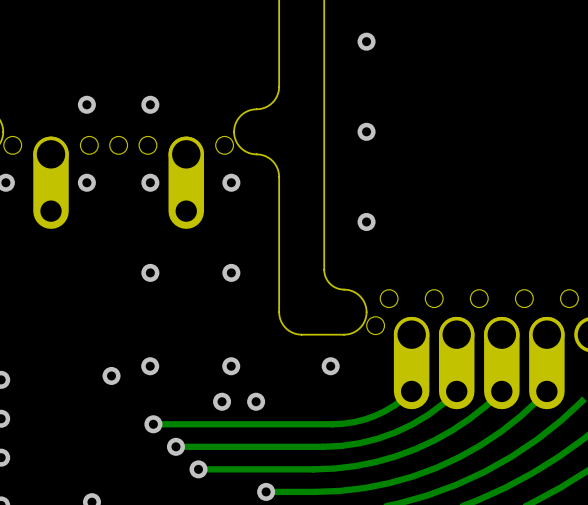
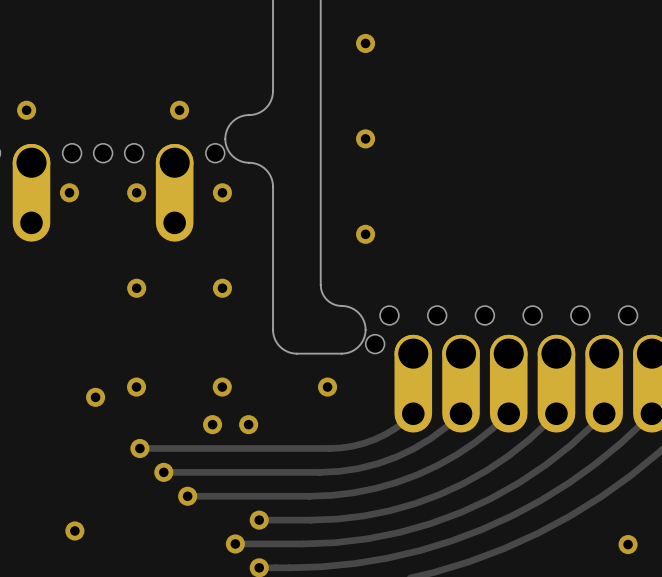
via position: (86, 104) -> (26, 110)
via position: (150, 104) -> (179, 110)

